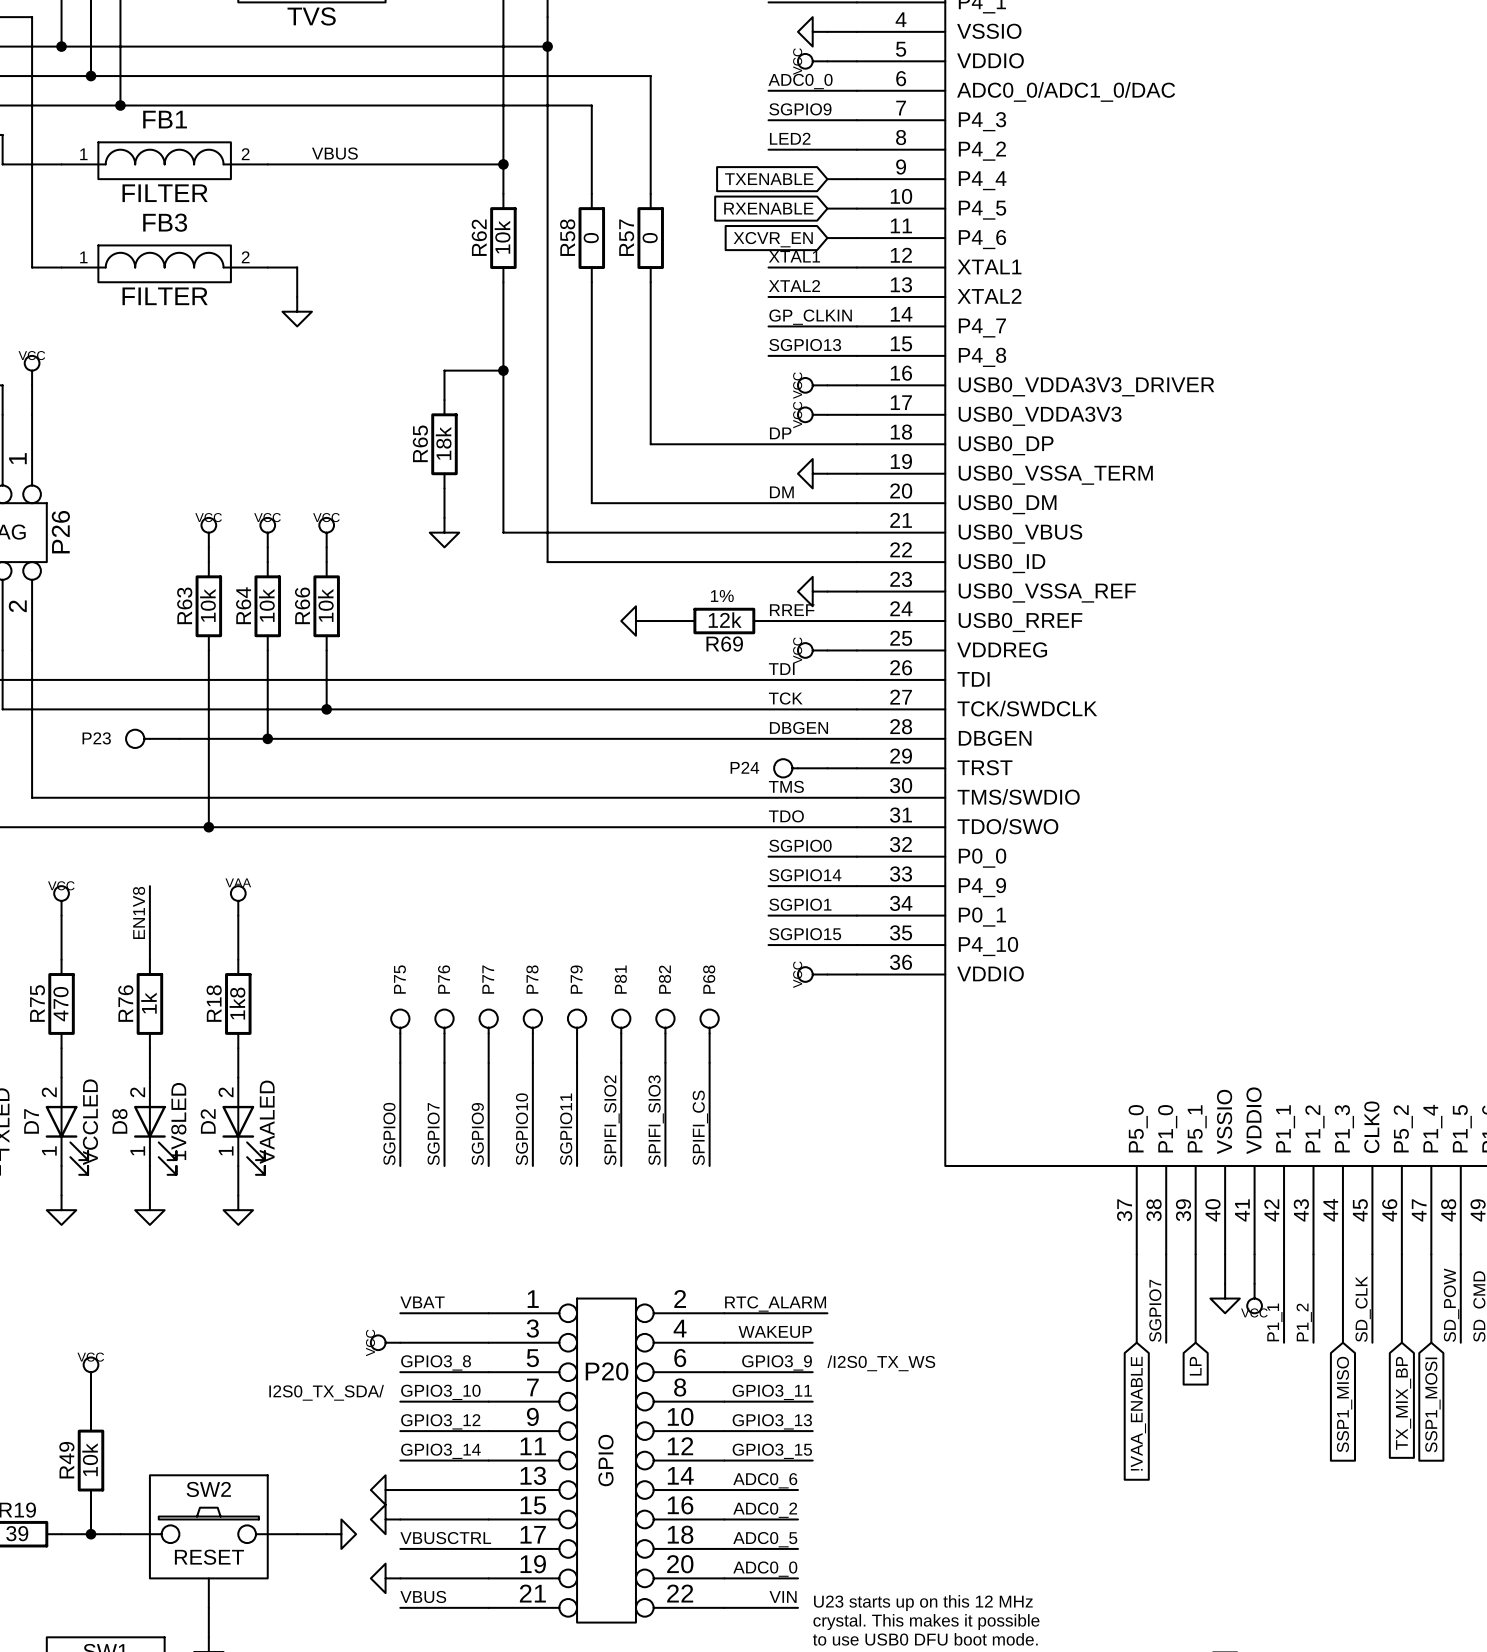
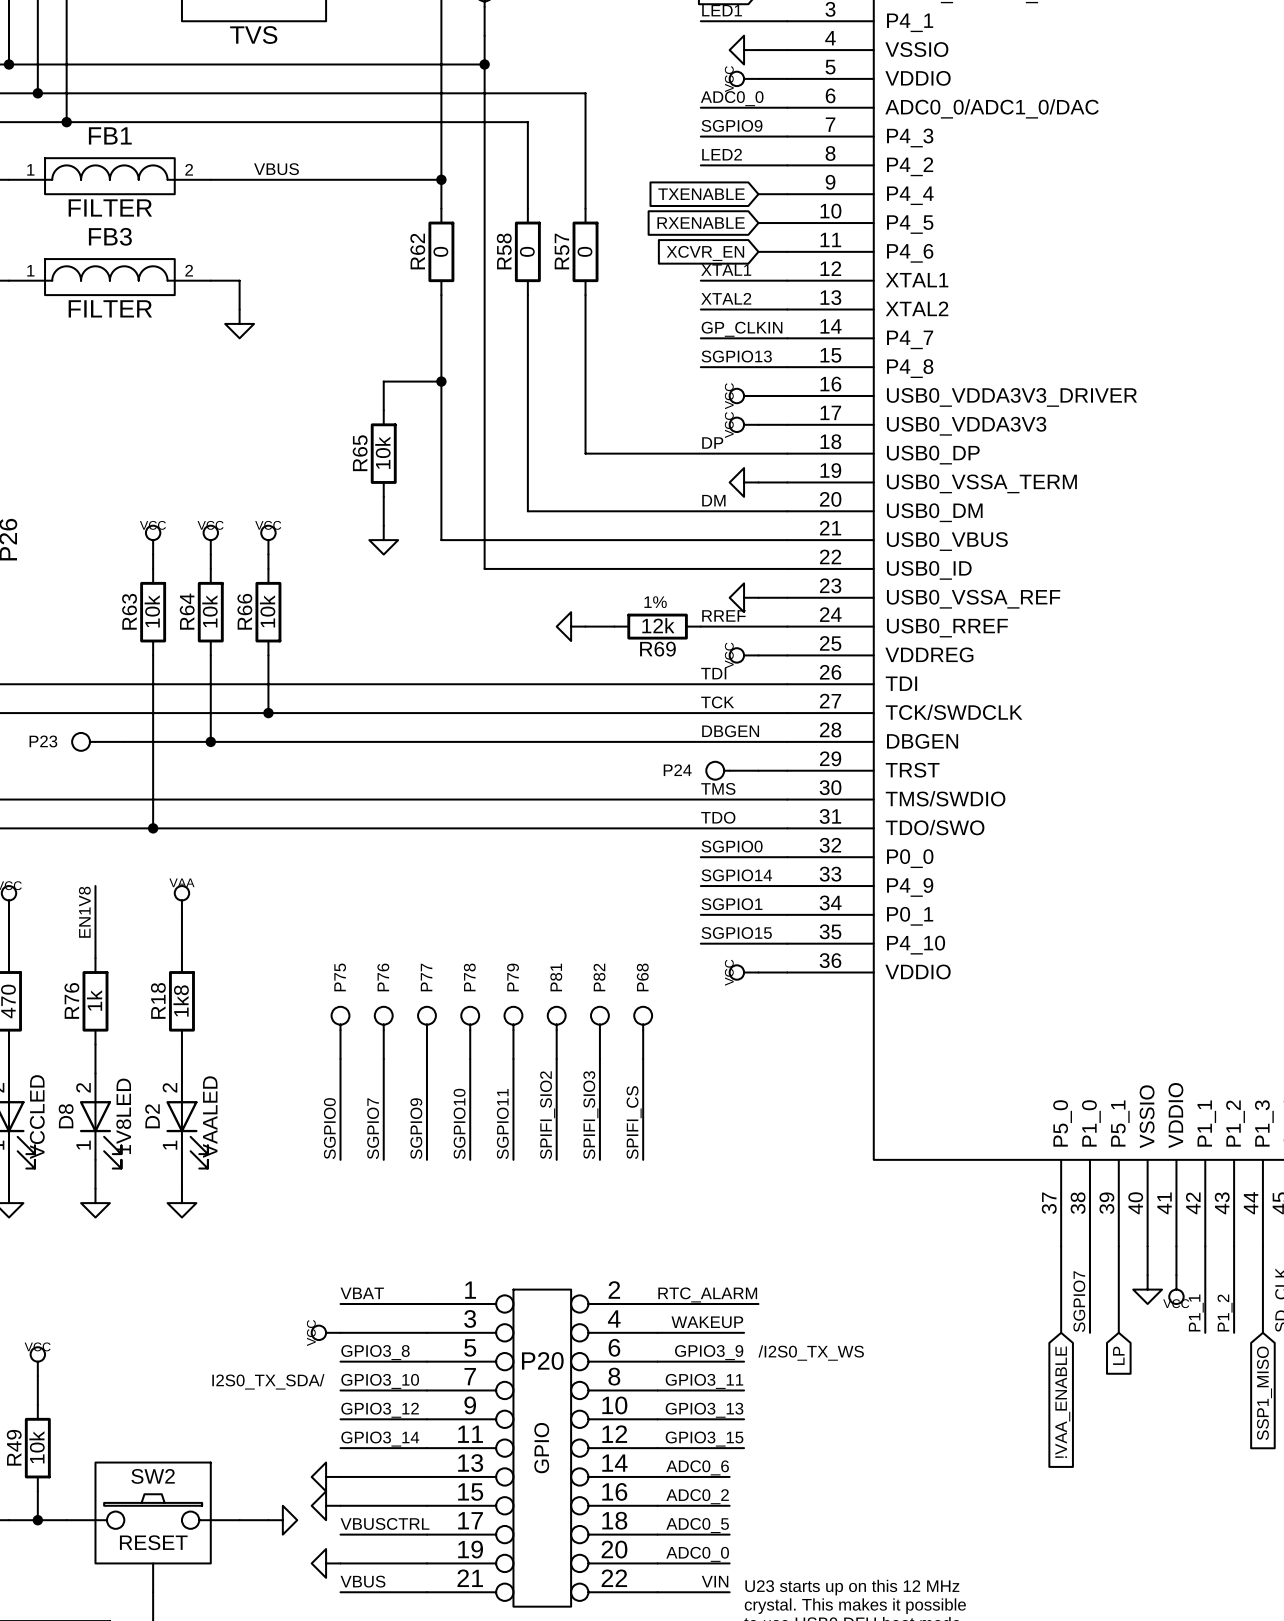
R62 value: 10k (502, 237) -> 0 (440, 251)
R65 value: 18k (443, 443) -> 10k (382, 452)

